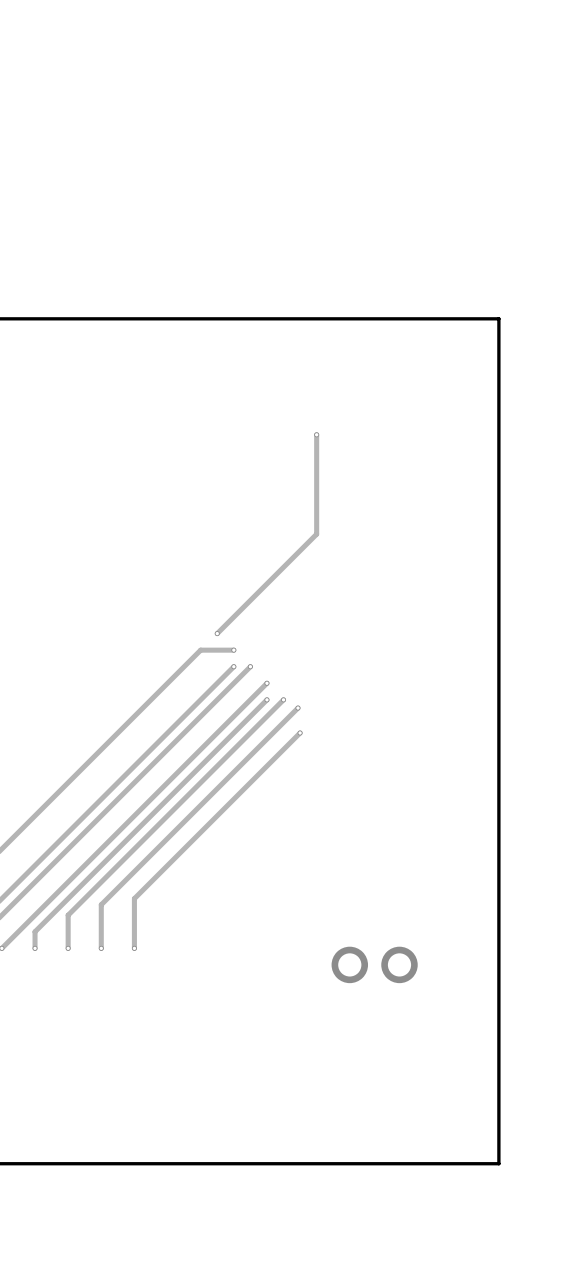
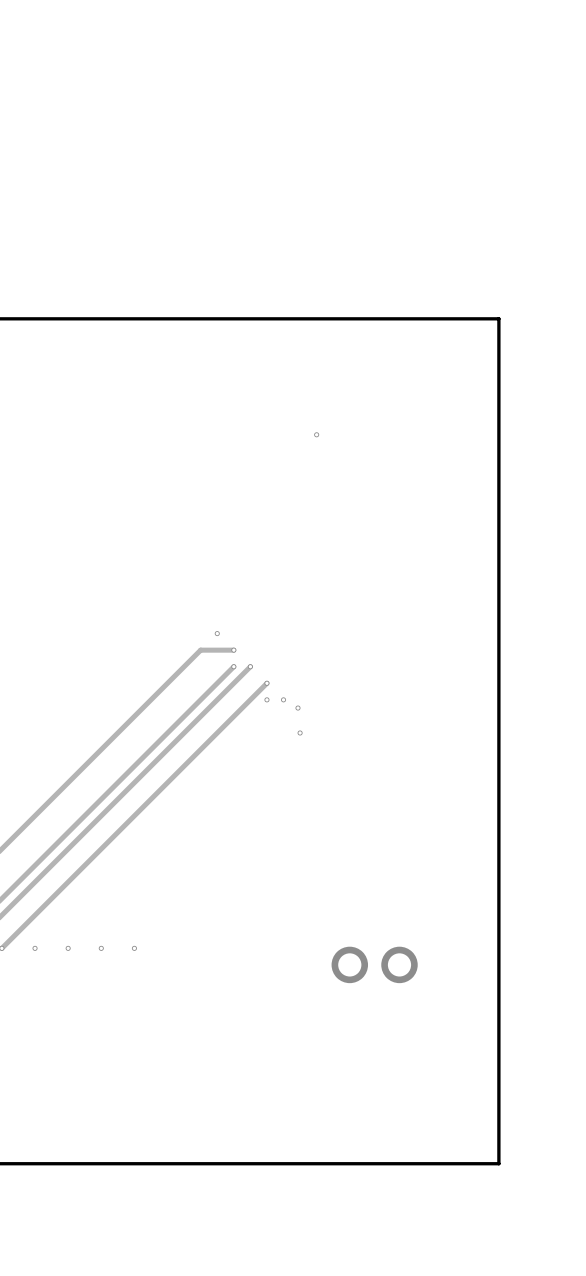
track: (316, 434) (316, 534) (217, 633) -> none
track: (266, 699) (35, 931) (35, 948) -> none
track: (283, 699) (68, 915) (68, 948) -> none
track: (297, 708) (101, 904) (101, 948) -> none
track: (300, 732) (134, 898) (134, 948) -> none

